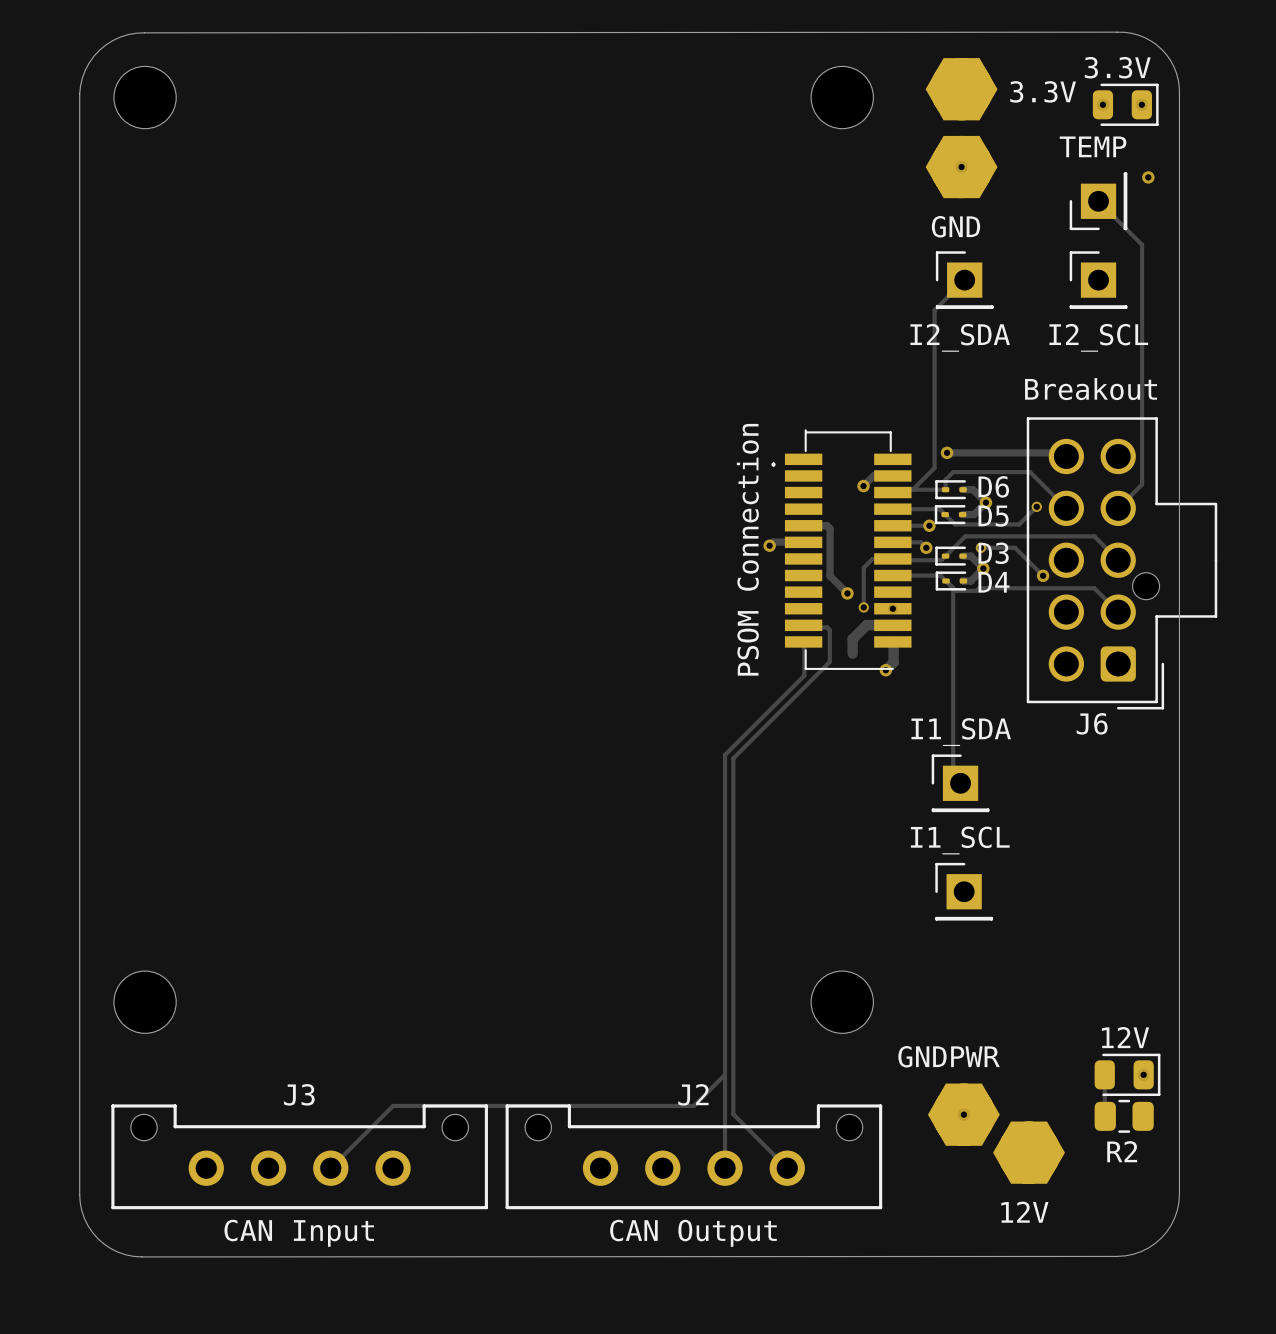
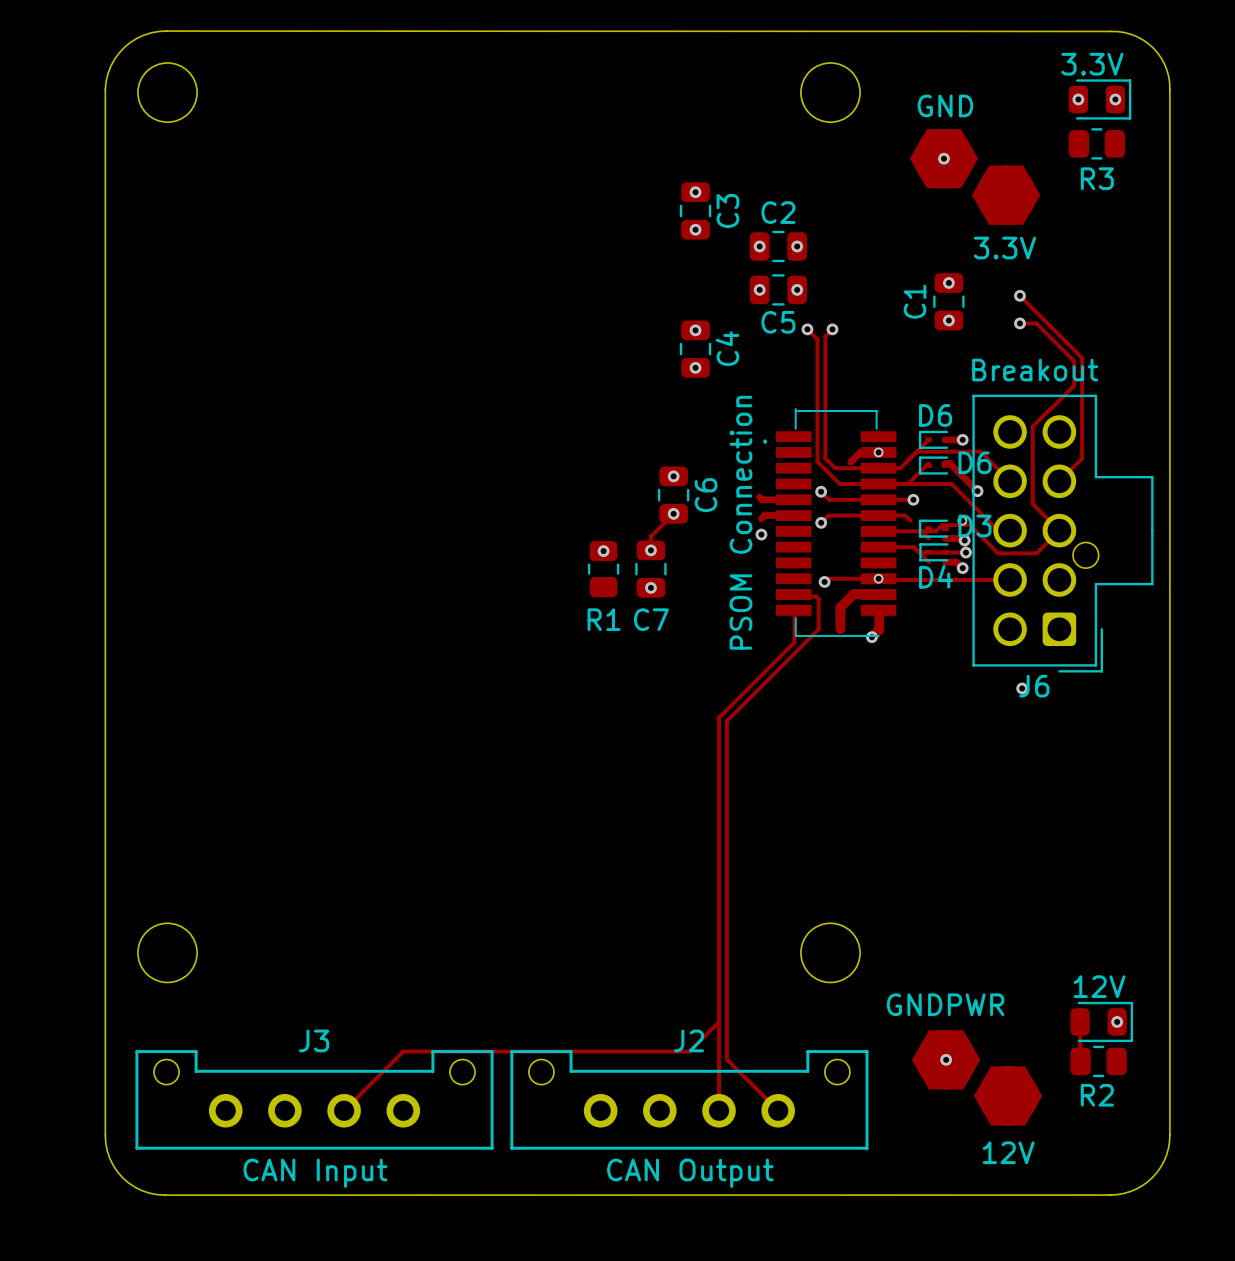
board edge: (144, 32) (1117, 32) (1138, 35) (1150, 40) (1161, 49) (1170, 60) (1176, 73) (1179, 94) (1179, 1194) (1174, 1217) (1161, 1238) (1141, 1251) (1117, 1256) (141, 1256) -> (167, 31) (1110, 31) (1130, 34) (1142, 39) (1152, 47) (1164, 63) (1168, 76) (1169, 89) (1169, 1135) (1166, 1155) (1156, 1172) (1136, 1189) (1116, 1194) (164, 1195)
part position: (961, 89) -> (1006, 195)
text position: 3.3V (1043, 91) -> 3.3V (1005, 248)
text: TEMP (1093, 146) -> none
R3: none -> (1096, 143)
via: (1148, 177) -> none
track: (1098, 201) (1142, 244) (1142, 484) (1118, 508) -> none
part: (1098, 201) -> none
via: none -> (695, 192)
C3: none -> (695, 210)
text position: GND (955, 226) -> GND (945, 105)
via: none -> (695, 229)
via: none -> (759, 246)
C2: none -> (778, 246)
via: none -> (797, 246)
track: (964, 280) (934, 310) (934, 467) (912, 489) -> none
part: (964, 280) -> none
part: (1098, 280) -> none
via: none -> (948, 282)
via: none -> (759, 289)
C5: none -> (778, 289)
via: none -> (797, 289)
track: none -> (1019, 295) (1082, 357) (1082, 458) (1059, 481)
via: none -> (1019, 295)
C1: none -> (948, 301)
text: I2_SDA (960, 337) -> none
via: none -> (948, 320)
text: I2_SCL (1098, 337) -> none
track: none -> (1019, 323) (1036, 323) (1074, 361) (1074, 385) (1032, 426) (1032, 503) (1059, 530) (1036, 553) (998, 553) (969, 525) (942, 525) (935, 531) (878, 531)
via: none -> (1019, 323)
track: none -> (807, 329) (817, 339) (817, 461) (839, 484) (878, 484)
via: none -> (807, 329)
track: none -> (832, 329) (825, 336) (825, 458) (835, 468) (900, 468) (928, 439)
via: none -> (832, 329)
via: none -> (695, 330)
C4: none -> (695, 349)
via: none -> (695, 367)
text position: Breakout (1091, 389) -> Breakout (1035, 370)
track: (947, 452) (1062, 452) (1066, 456) -> none
via: (947, 452) -> none
D6: none -> (933, 439)
track: none -> (945, 439) (962, 439)
via: none -> (962, 439)
via: none -> (878, 452)
track: none -> (916, 451) (980, 451) (1010, 481)
via: (863, 486) -> none
track: none -> (928, 463) (907, 484)
track: none -> (944, 463) (949, 463) (977, 491)
track: (963, 489) (972, 489) (985, 502) (974, 514) (962, 514) -> none
track: (892, 492) (895, 489) (945, 489) (945, 479) (953, 472) (1030, 472) (1066, 508) -> none
via: none -> (673, 476)
via position: (985, 502) -> (977, 491)
track: (1036, 506) (1019, 524) (955, 524) (939, 509) -> (1010, 530) (998, 530) (951, 484) (923, 484)
via: (1036, 506) -> none
D5: (950, 514) -> none
track: none -> (821, 491) (829, 499) (878, 499)
via: none -> (821, 491)
C6: none -> (673, 495)
track: (803, 525) (826, 525) (830, 528) (830, 576) (847, 593) -> (793, 499) (762, 499) (759, 497)
track: none -> (673, 513) (650, 536) (650, 550)
via: none -> (673, 513)
track: none -> (878, 515) (828, 515) (821, 522)
via position: (769, 545) -> (761, 534)
via: (926, 547) -> none
track: (980, 547) (1015, 547) (1043, 575) -> none
via: none -> (821, 522)
track: (963, 556) (970, 556) (983, 568) (970, 581) (963, 580) -> none
track: none -> (921, 531) (928, 538)
track: (1118, 560) (1094, 536) (965, 536) (941, 560) (872, 558) (863, 567) (863, 607) -> none
J6 position: (1121, 563) -> (1062, 533)
track: none -> (963, 536) (945, 538)
track: (930, 575) (940, 575) (955, 590) (976, 590) (979, 588) (1094, 588) (1118, 612) -> (914, 547) (929, 562)
via: (1043, 575) -> none
via: none -> (650, 550)
via: none -> (603, 551)
track: none -> (919, 552) (965, 552)
via: none -> (965, 552)
D4 name position: D4 (994, 582) -> D4 (936, 576)
track: (953, 588) (953, 775) (960, 783) -> none
track: none -> (945, 562) (956, 562) (962, 568)
via position: (847, 593) -> (824, 581)
via: none -> (962, 568)
R1: none -> (603, 569)
C7: none -> (650, 569)
via: (863, 607) -> none
track: none -> (1010, 579) (827, 578) (824, 581)
via: none -> (650, 587)
track: none -> (840, 621) (840, 629)
via: none -> (1022, 688)
text: I1_SDA (961, 732) -> none
part: (960, 783) -> none
text: I1_SCL (960, 840) -> none
part: (964, 891) -> none

